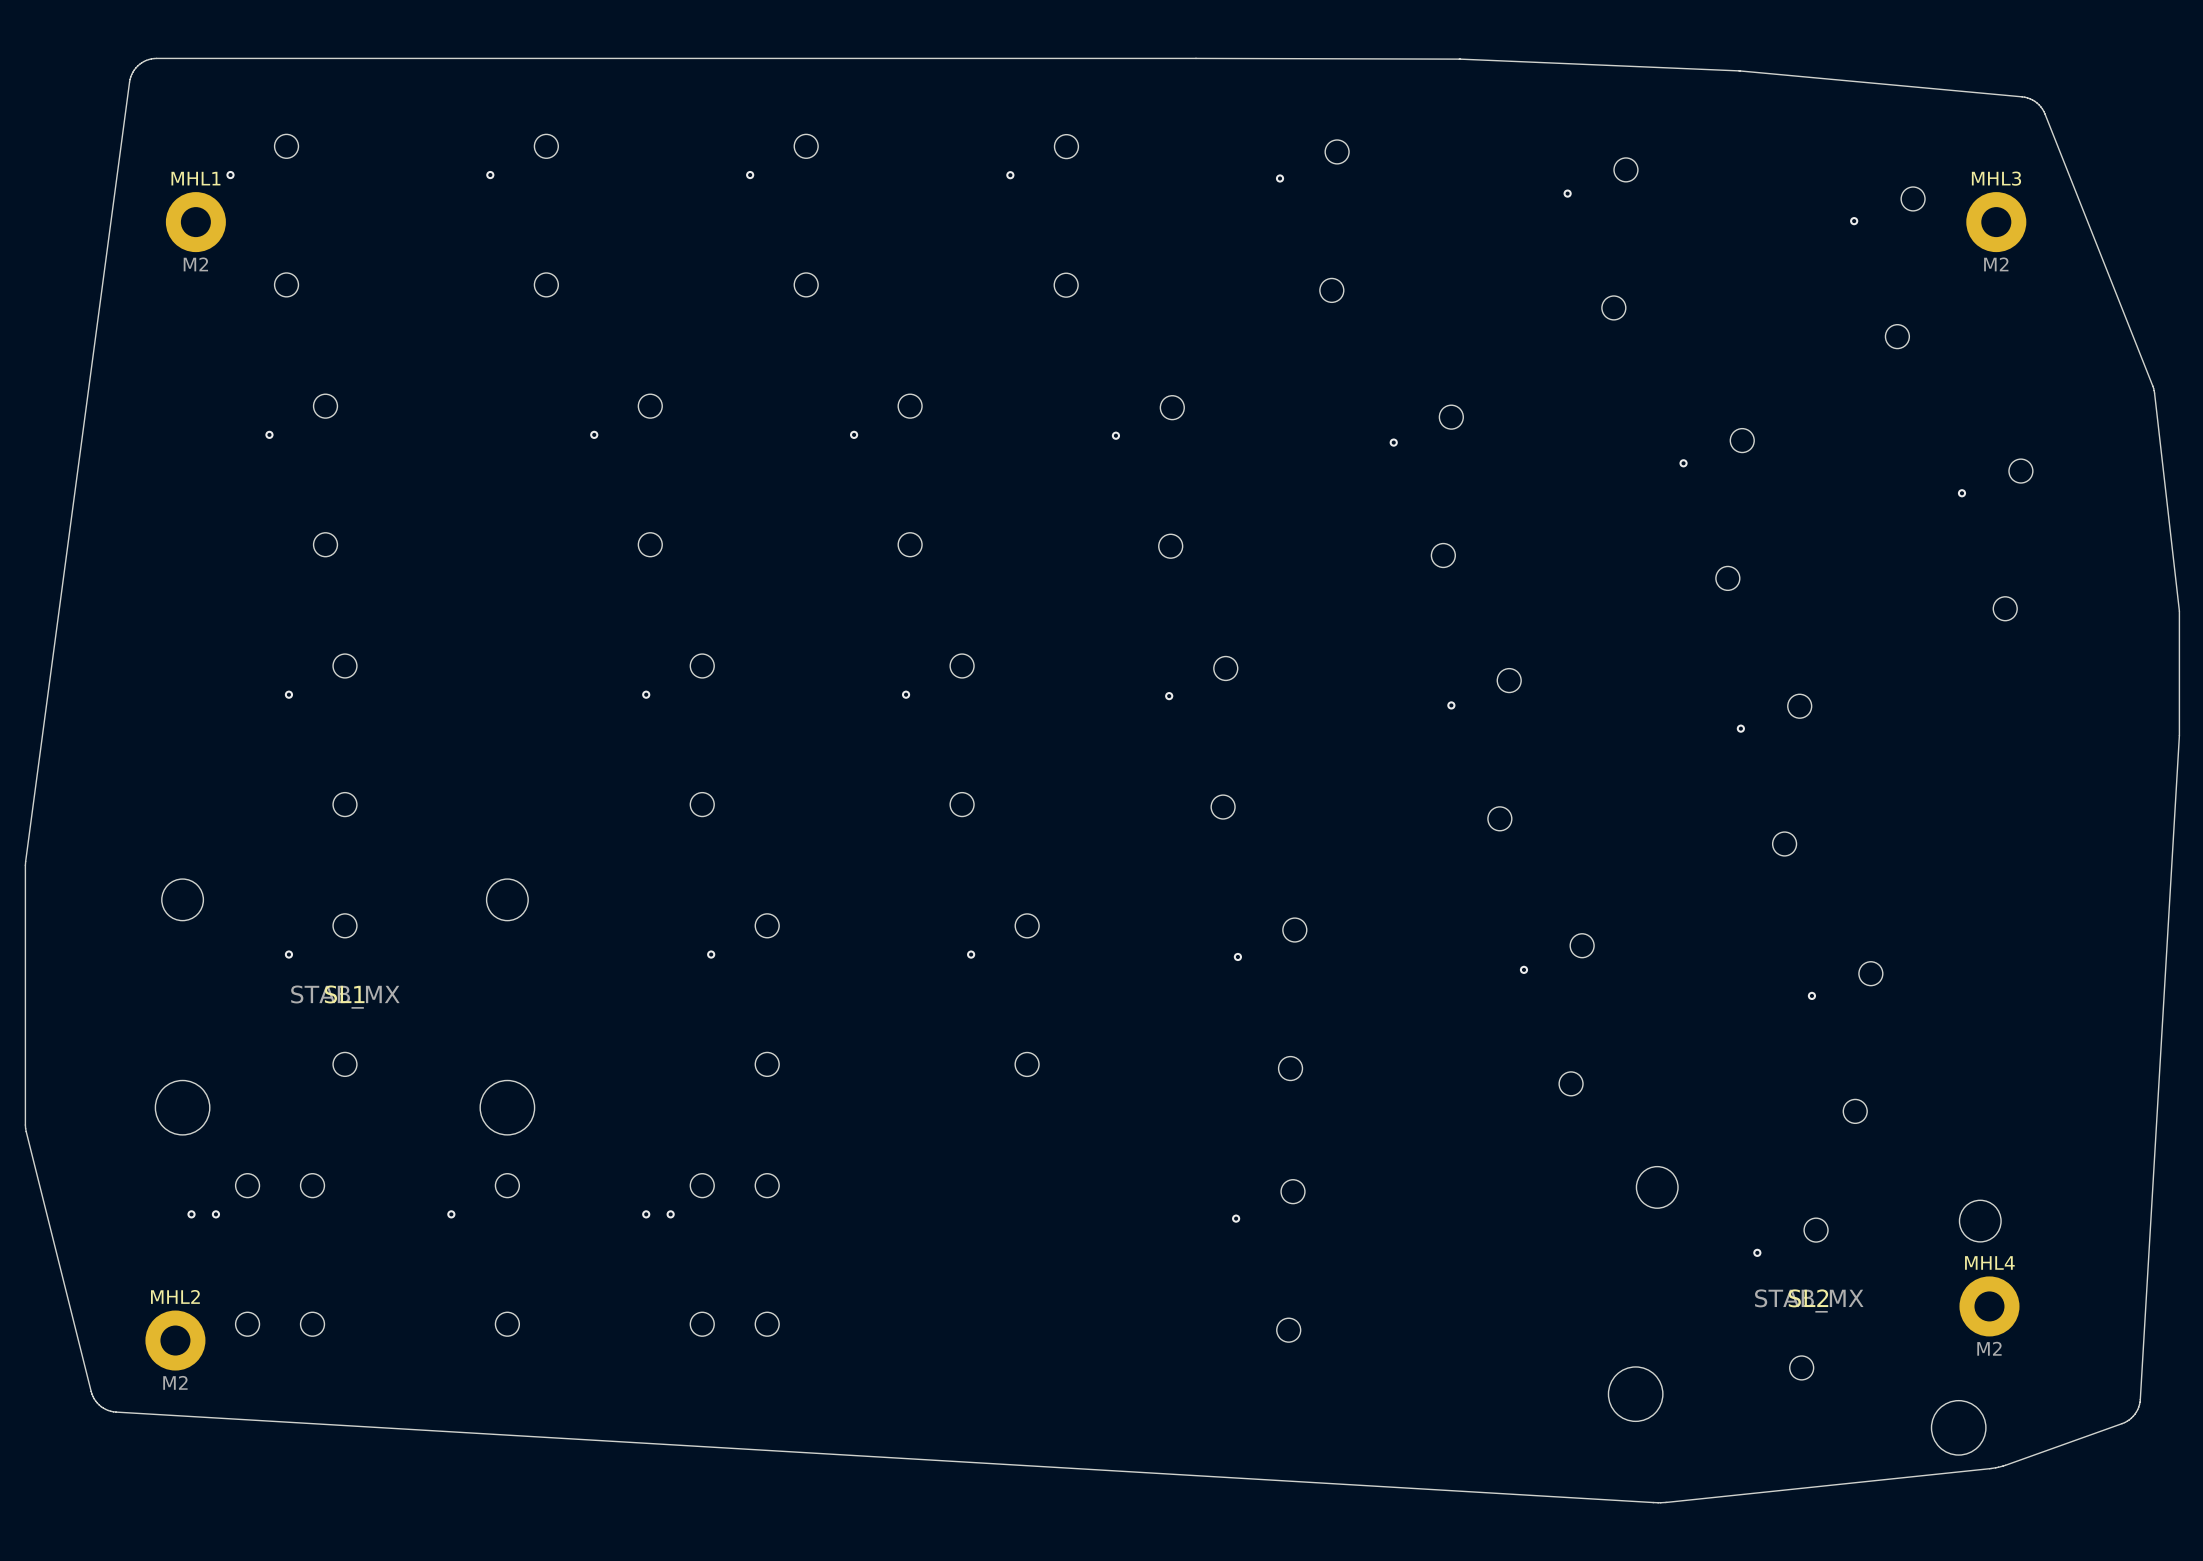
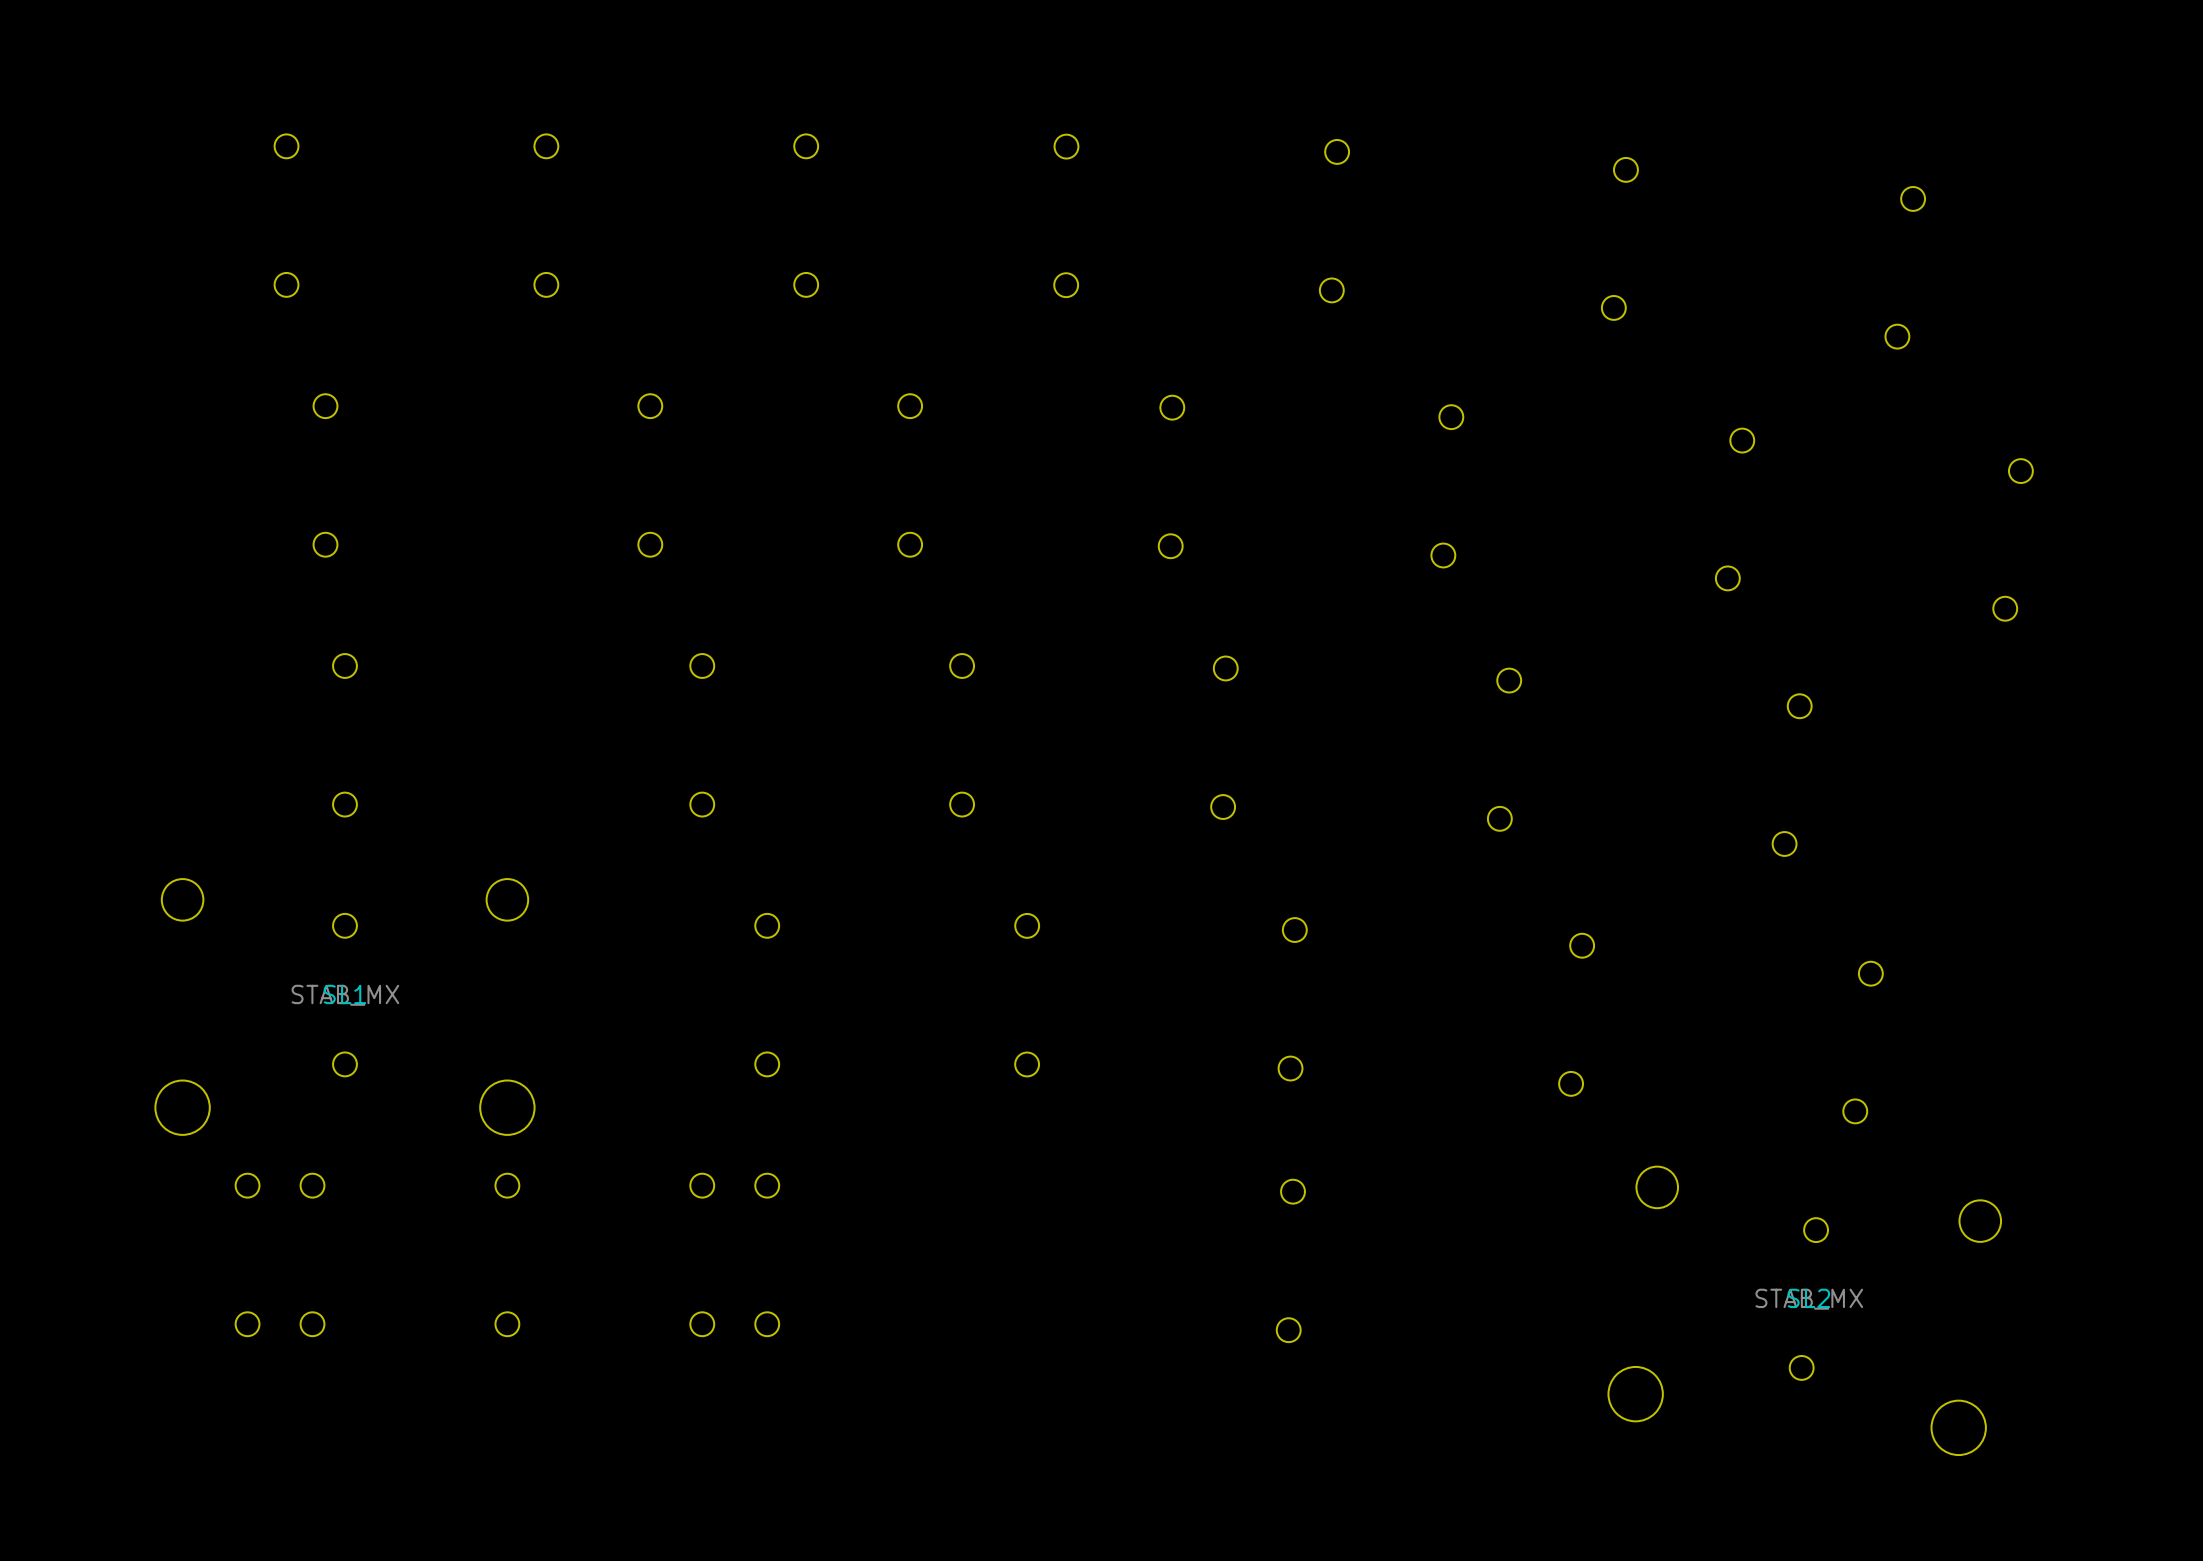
board edge: (156, 58) (1460, 59) (1740, 70) (2022, 96) (2034, 101) (2044, 113) (2153, 388) (2179, 611) (2179, 735) (2140, 1399) (2134, 1414) (2122, 1423) (1995, 1467) (1658, 1502) (116, 1412) (101, 1406) (94, 1398) (91, 1391) (25, 1128) (25, 865) (129, 82) (132, 72) (139, 64) (156, 58) -> none
via: (230, 175) -> none
via: (490, 175) -> none
via: (750, 175) -> none
via: (1010, 175) -> none
via: (1280, 178) -> none
via: (1567, 193) -> none
via: (1854, 221) -> none
MHL1: M2 (195, 222) -> none
MHL3: M2 (1996, 222) -> none
via: (269, 434) -> none
via: (594, 434) -> none
via: (854, 434) -> none
via: (1115, 435) -> none
via: (1393, 442) -> none
via: (1683, 463) -> none
via: (1961, 493) -> none
via: (288, 694) -> none
via: (646, 694) -> none
via: (906, 694) -> none
via: (1169, 696) -> none
via: (1451, 705) -> none
via: (1740, 728) -> none
via: (288, 954) -> none
via: (711, 954) -> none
via: (971, 954) -> none
via: (1237, 956) -> none
via: (1523, 969) -> none
via: (1811, 995) -> none
via: (191, 1214) -> none
via: (215, 1214) -> none
via: (451, 1214) -> none
via: (646, 1214) -> none
via: (670, 1214) -> none
via: (1236, 1218) -> none
via: (1757, 1252) -> none
MHL4: M2 (1989, 1306) -> none
MHL2: M2 (175, 1340) -> none

